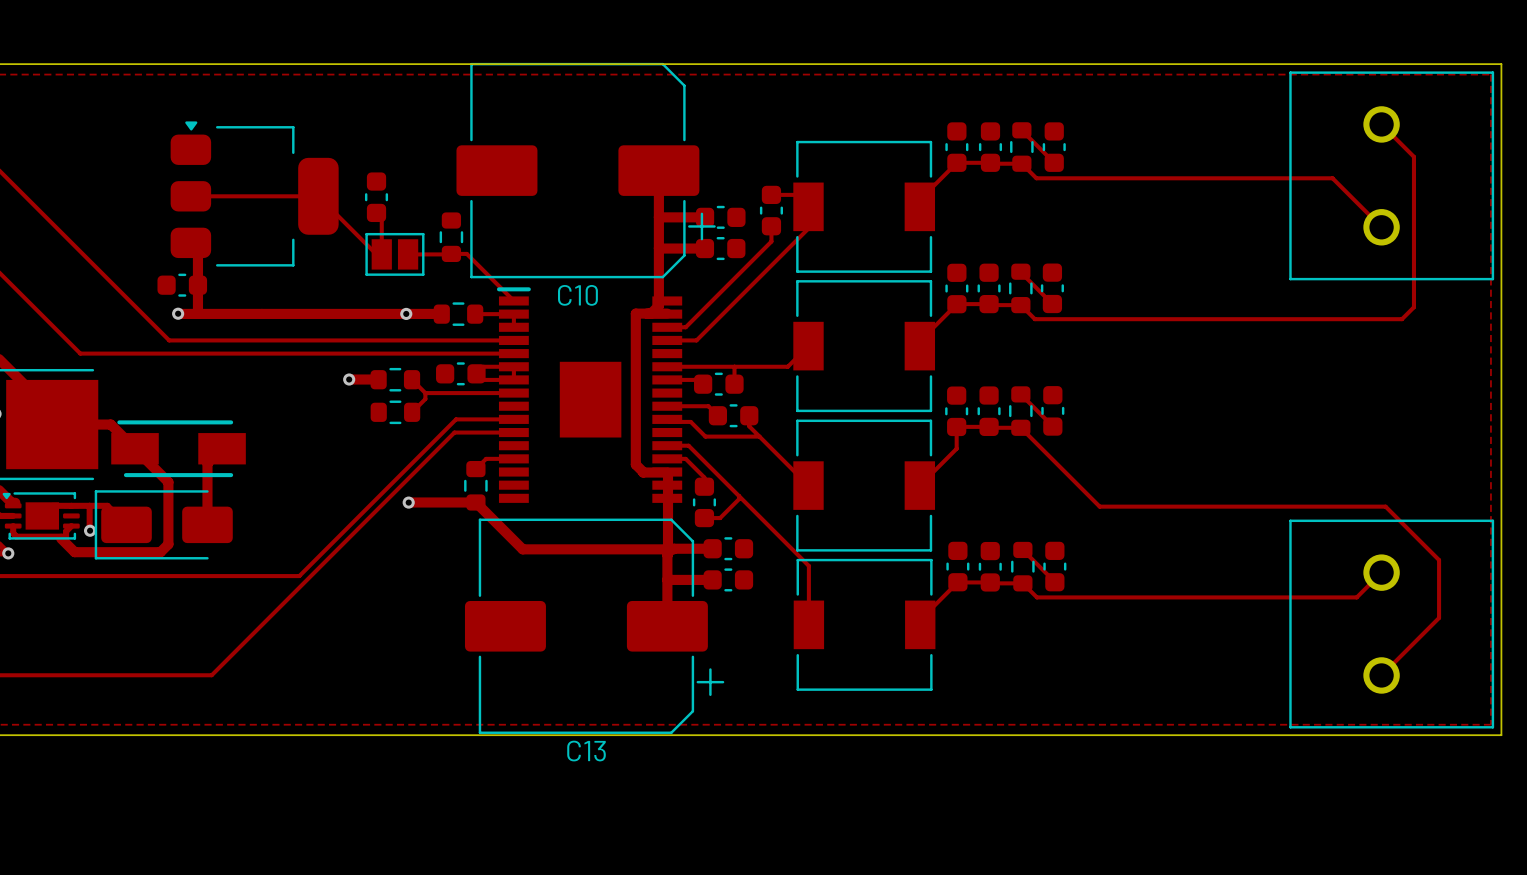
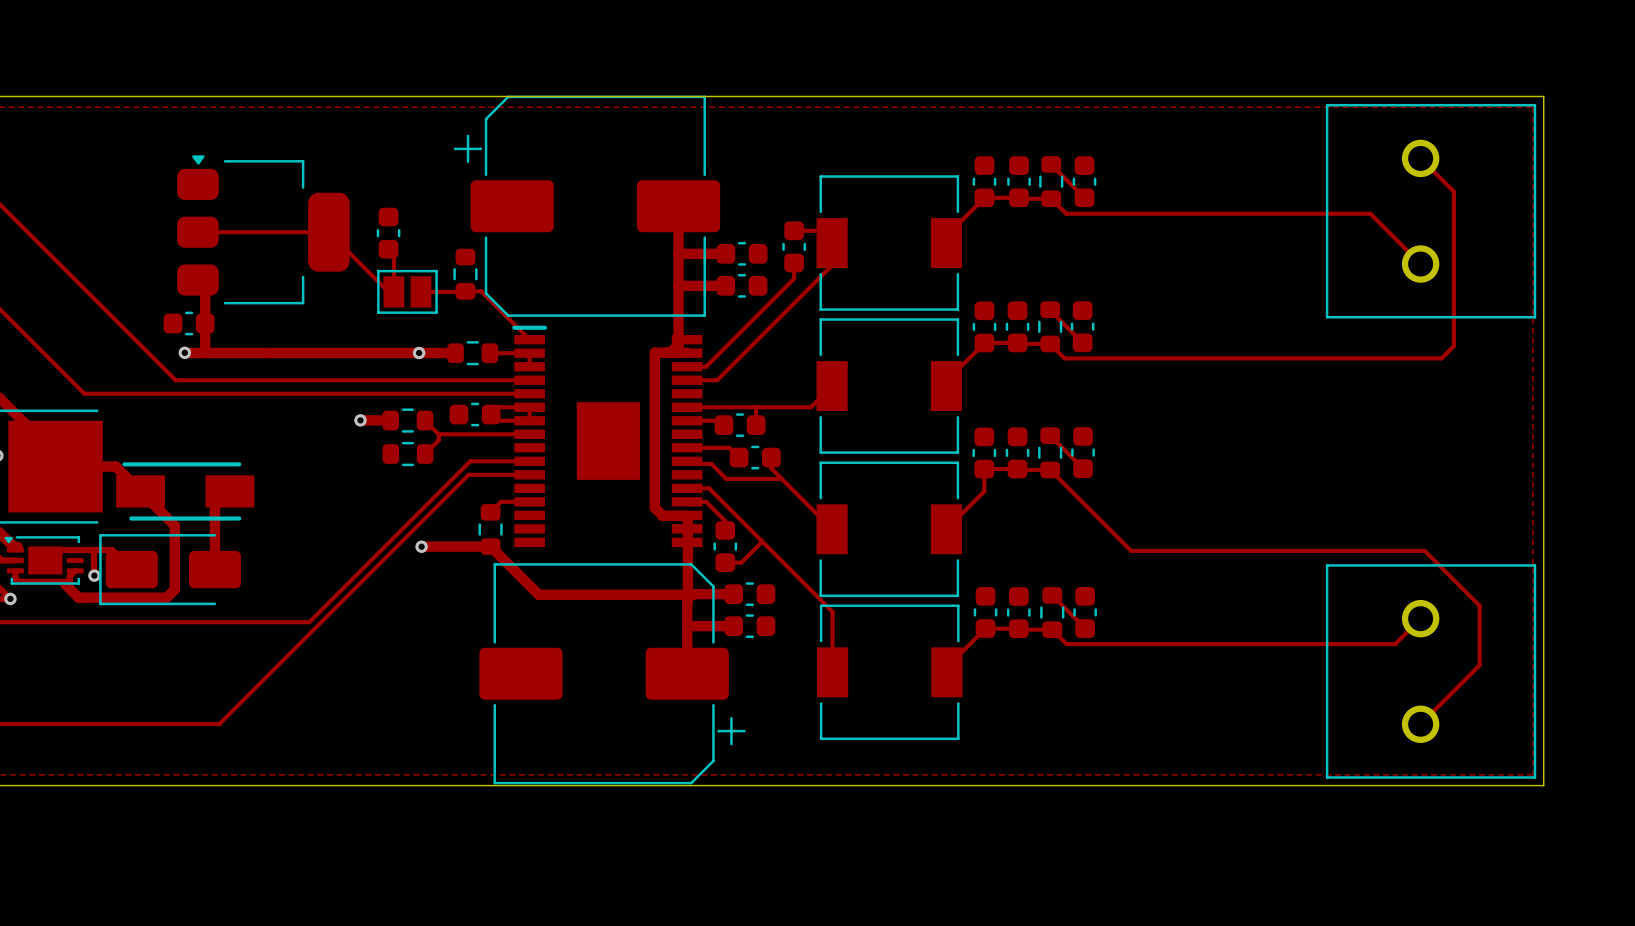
C10: (586, 170) -> none
part: none -> (586, 206)
C13 name: C13 (586, 751) -> none

